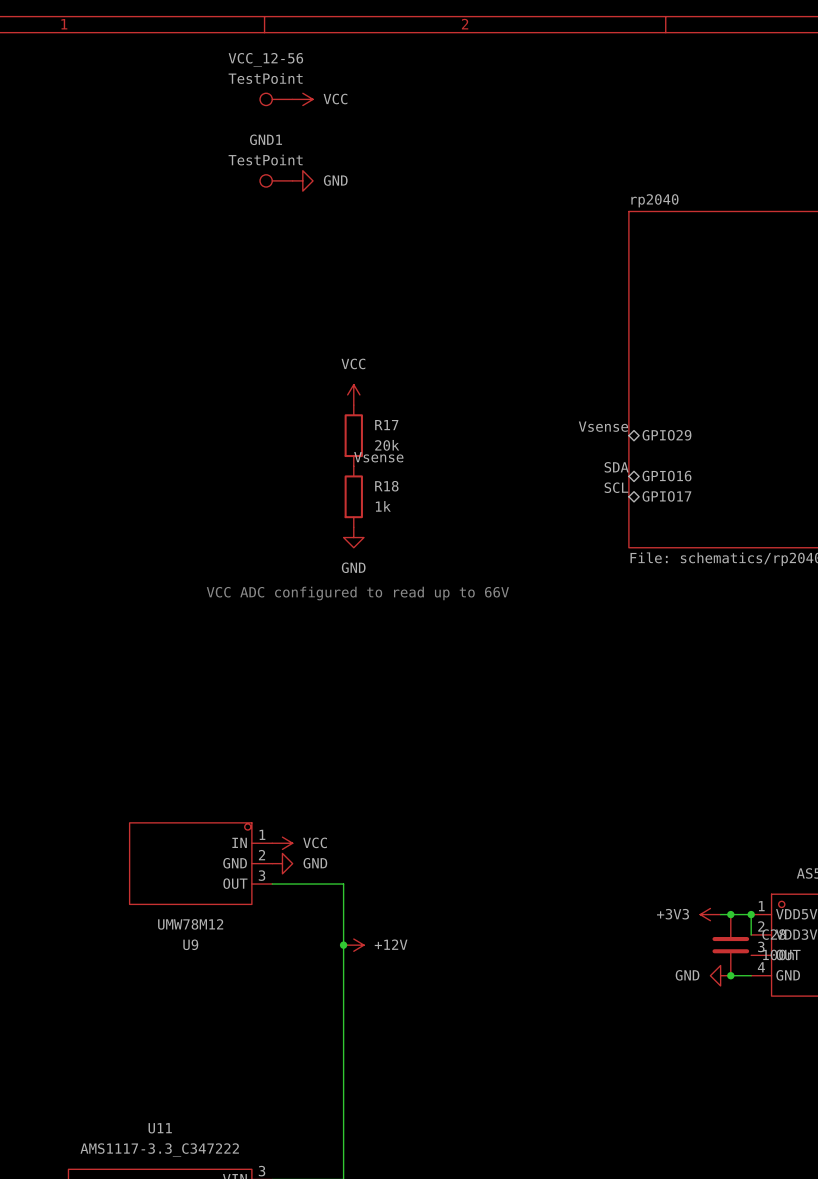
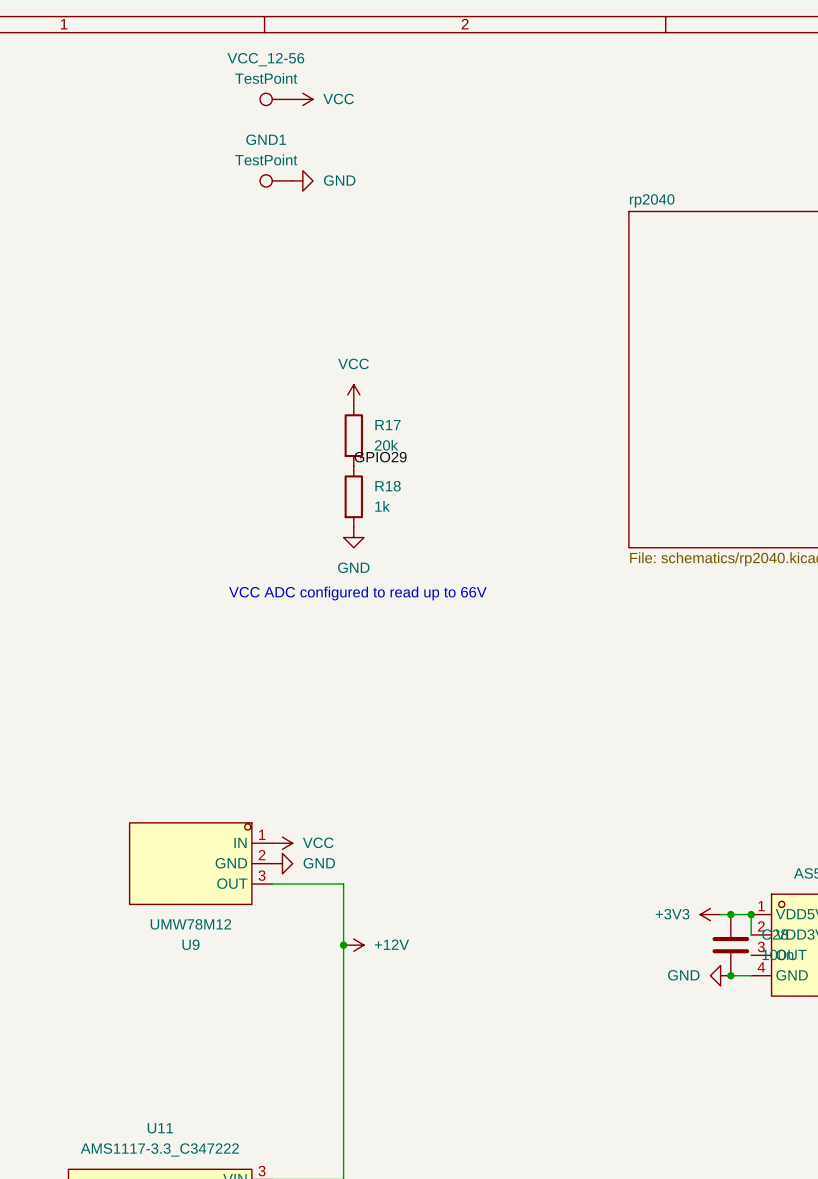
label: Vsense (603, 426) -> none
sheet pin: GPIO29 (666, 435) -> none
label: Vsense (378, 457) -> GPIO29 (380, 457)
label: SDA (616, 467) -> none
sheet pin: GPIO16 (666, 476) -> none
label: SCL (616, 487) -> none
sheet pin: GPIO17 (666, 496) -> none

